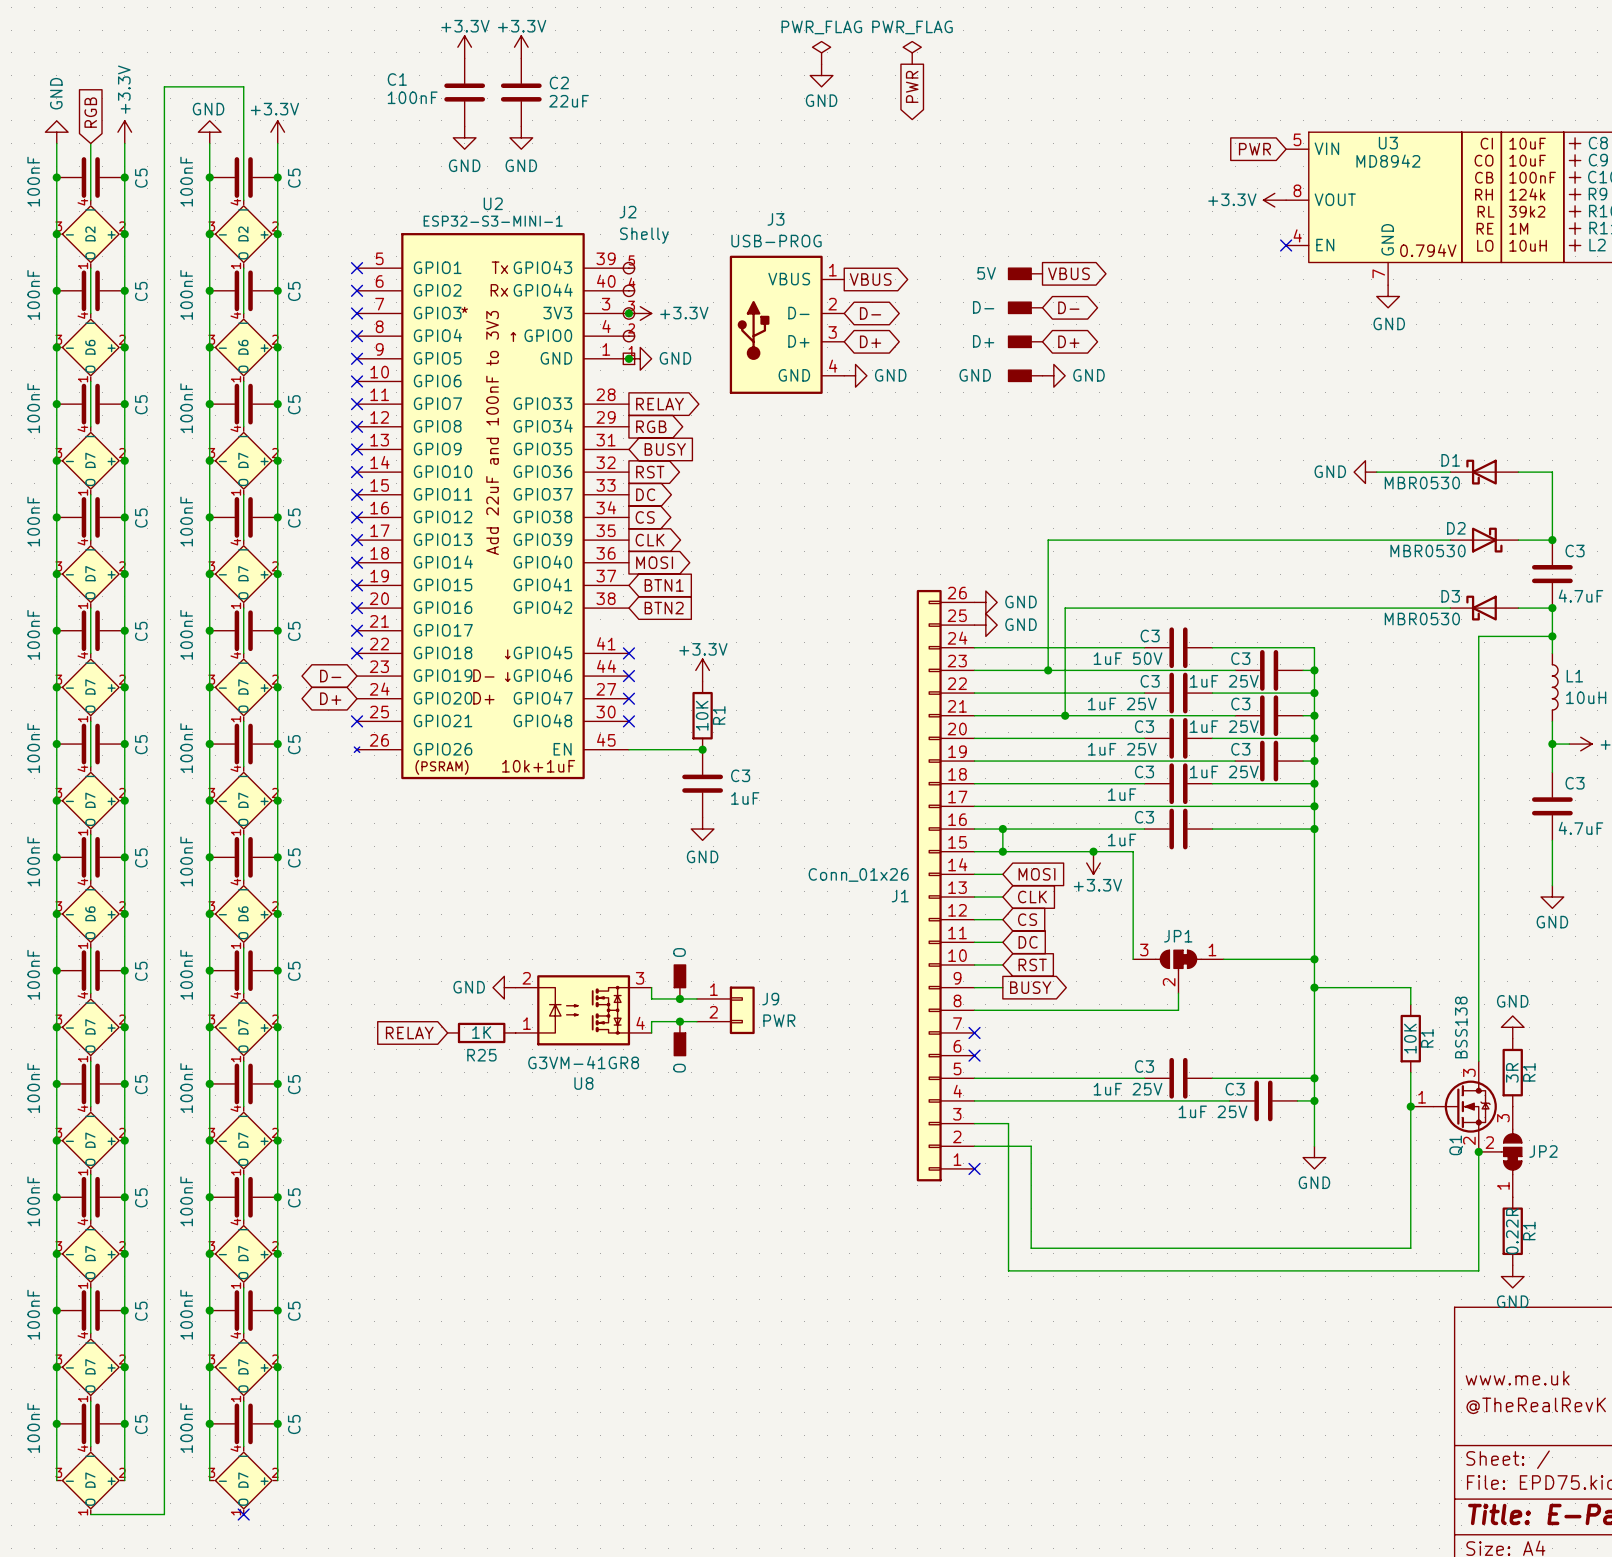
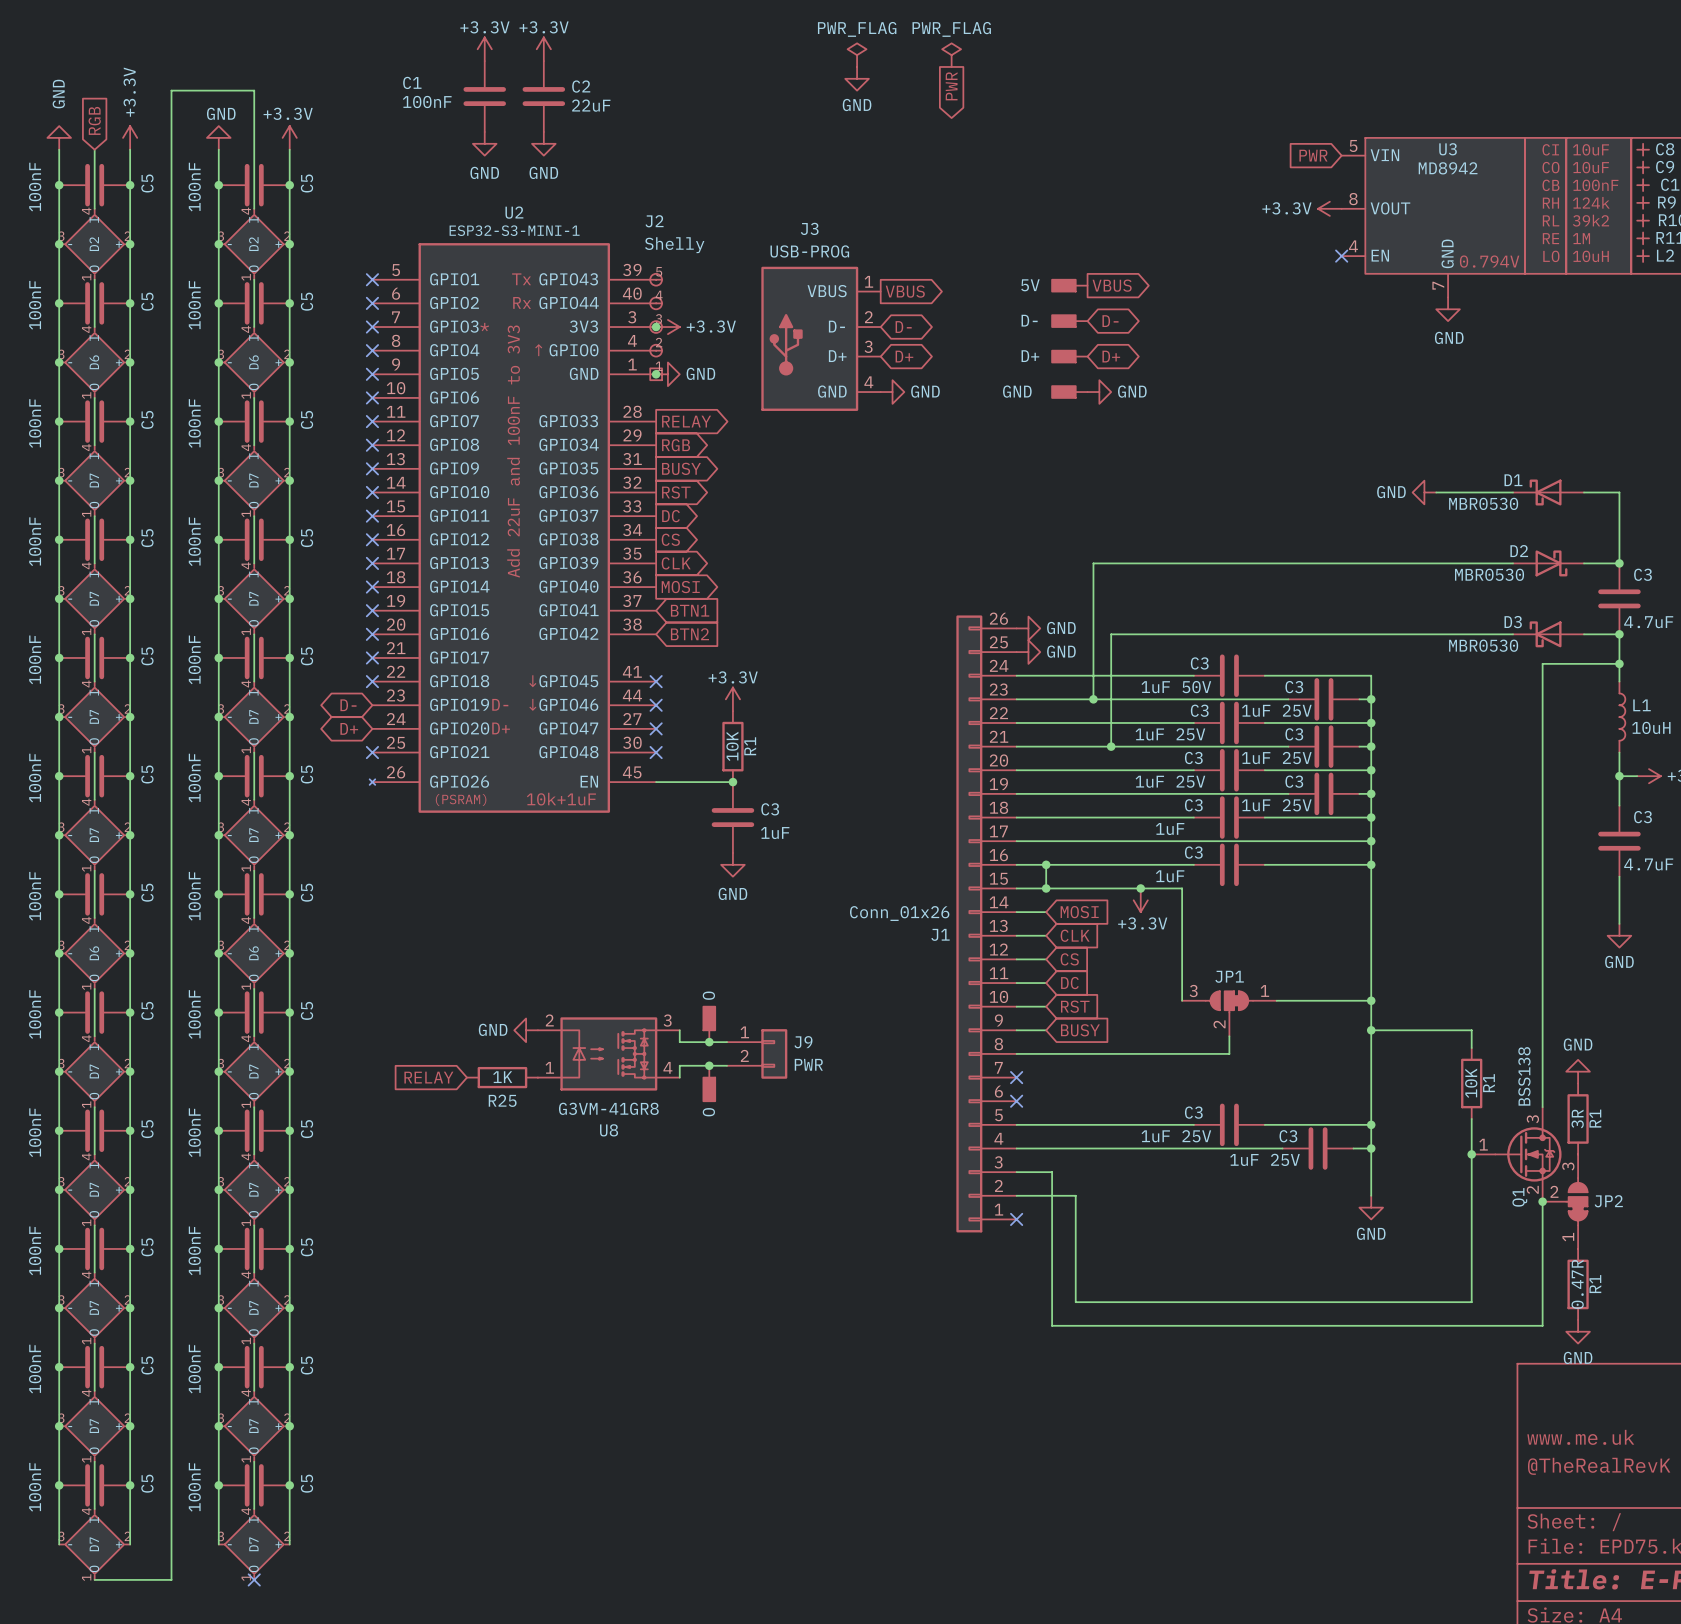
global label shape: input (665, 449) -> output (681, 468)
global label shape: output (1030, 987) -> input (1080, 1030)
R1 value: 0.22R (1512, 1231) -> 0.47R (1577, 1284)

